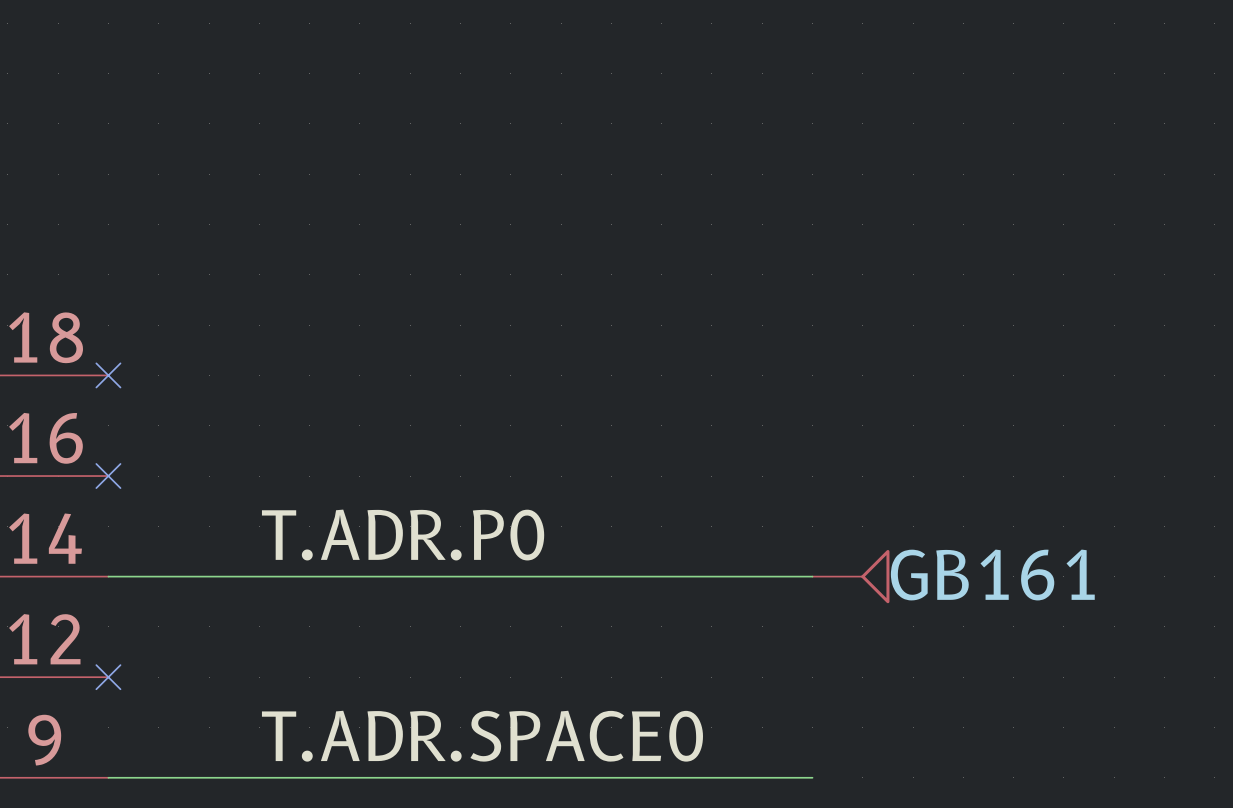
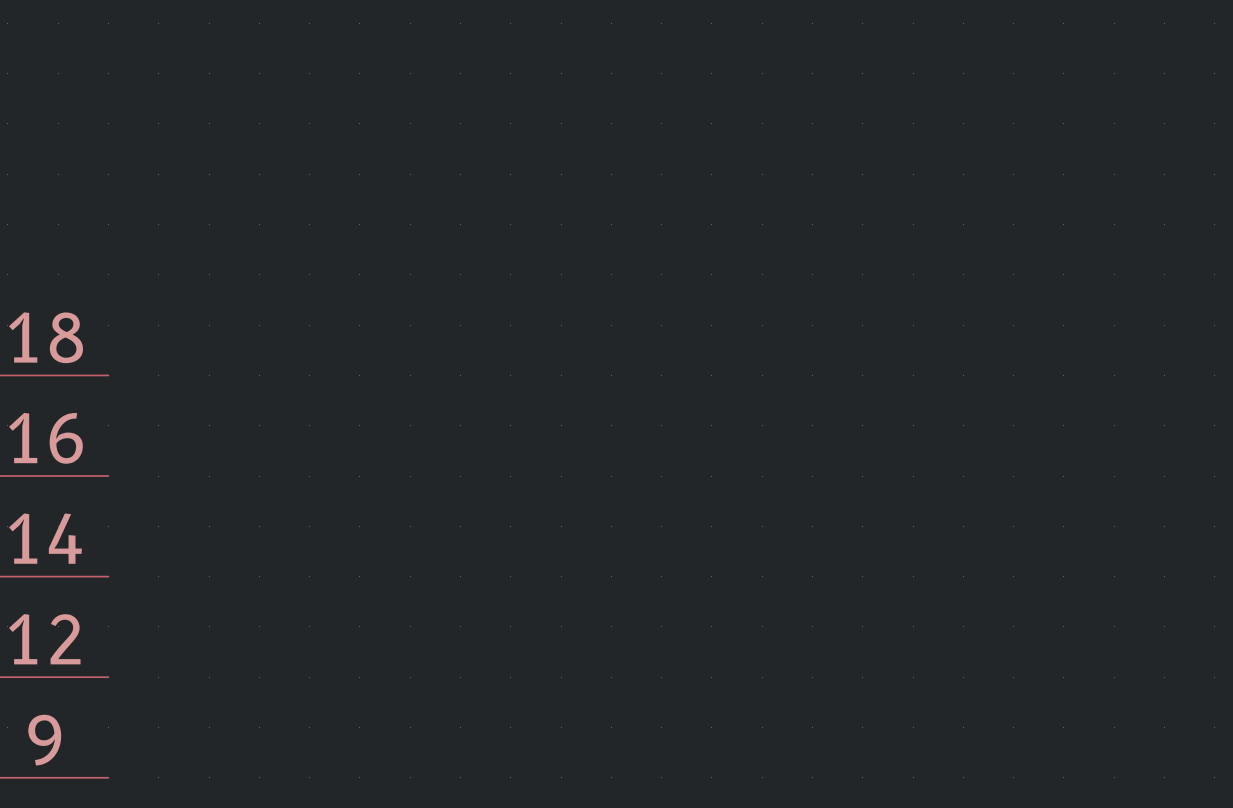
no-connect mark: (108, 375) -> none
no-connect mark: (108, 476) -> none
label: T.ADR.P0 (403, 535) -> none
wire: (108, 576) (812, 576) -> none
GB161: (850, 576) -> none
no-connect mark: (108, 677) -> none
label: T.ADR.SPACE0 (482, 736) -> none
wire: (108, 777) (812, 777) -> none

